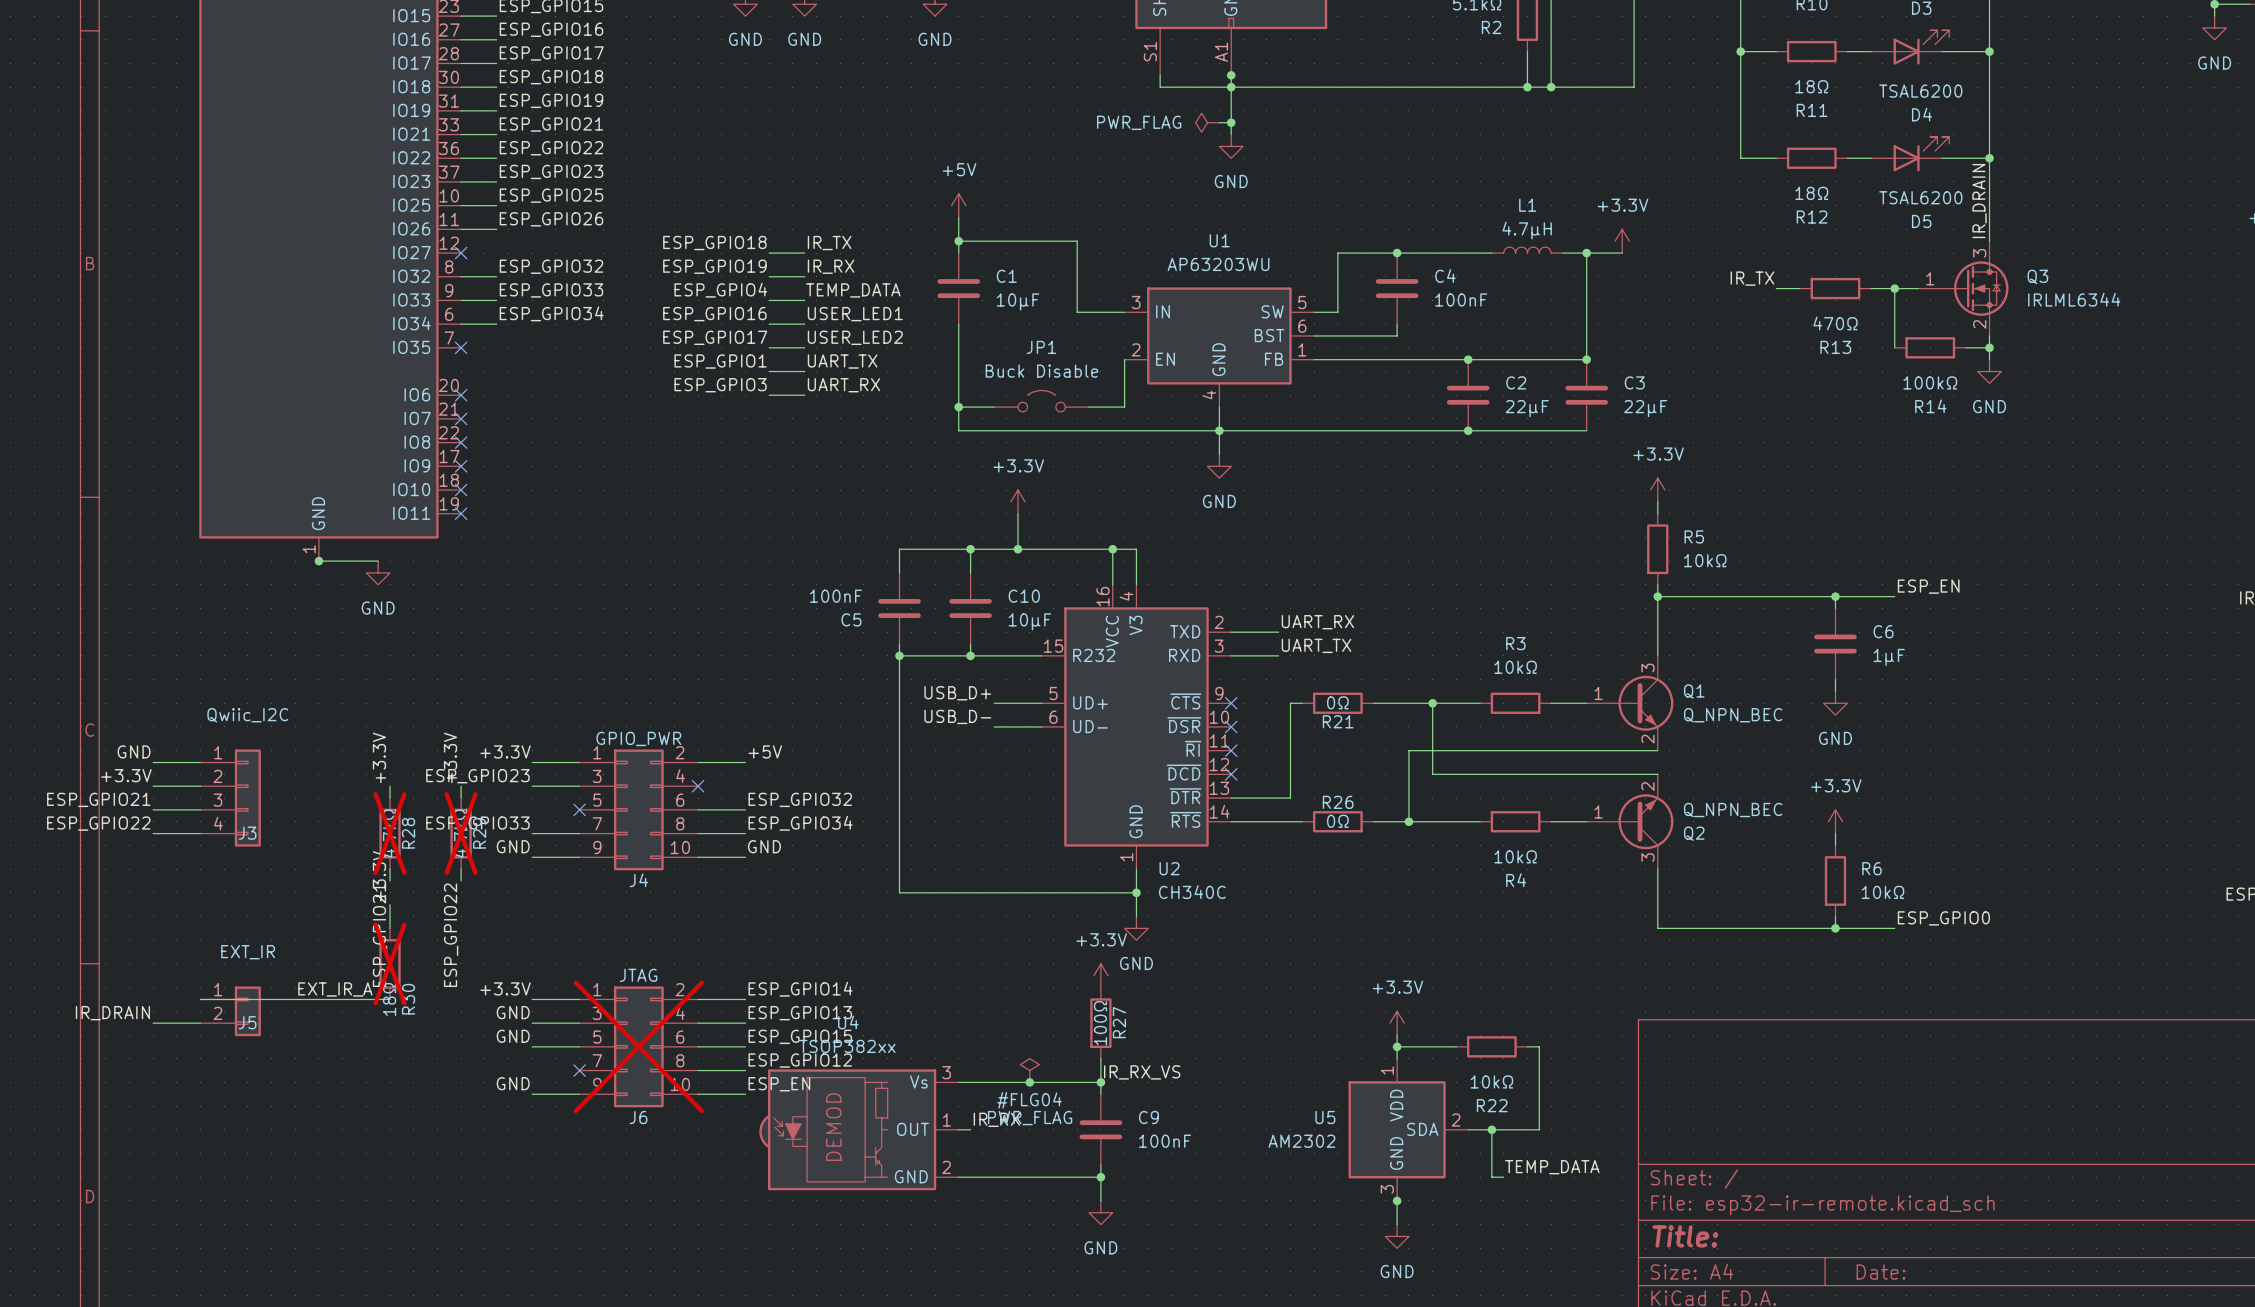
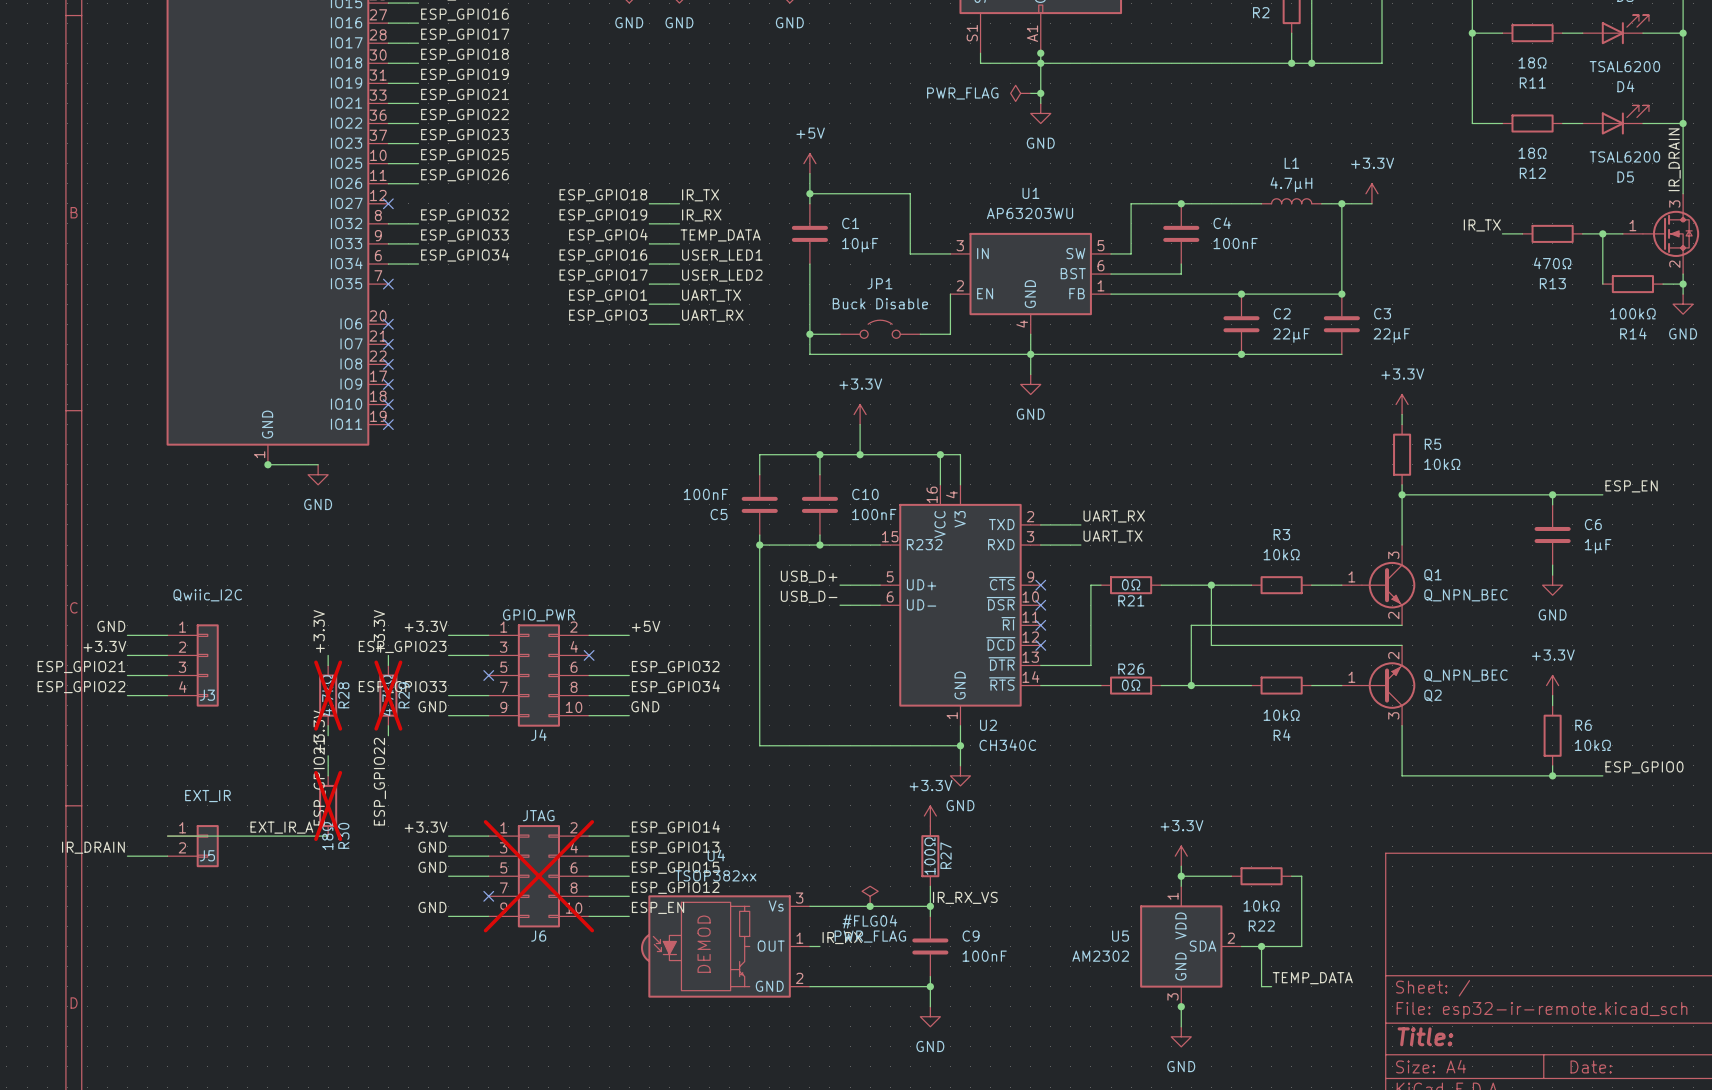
C10 value: 10µF (1029, 621) -> 100nF (874, 514)

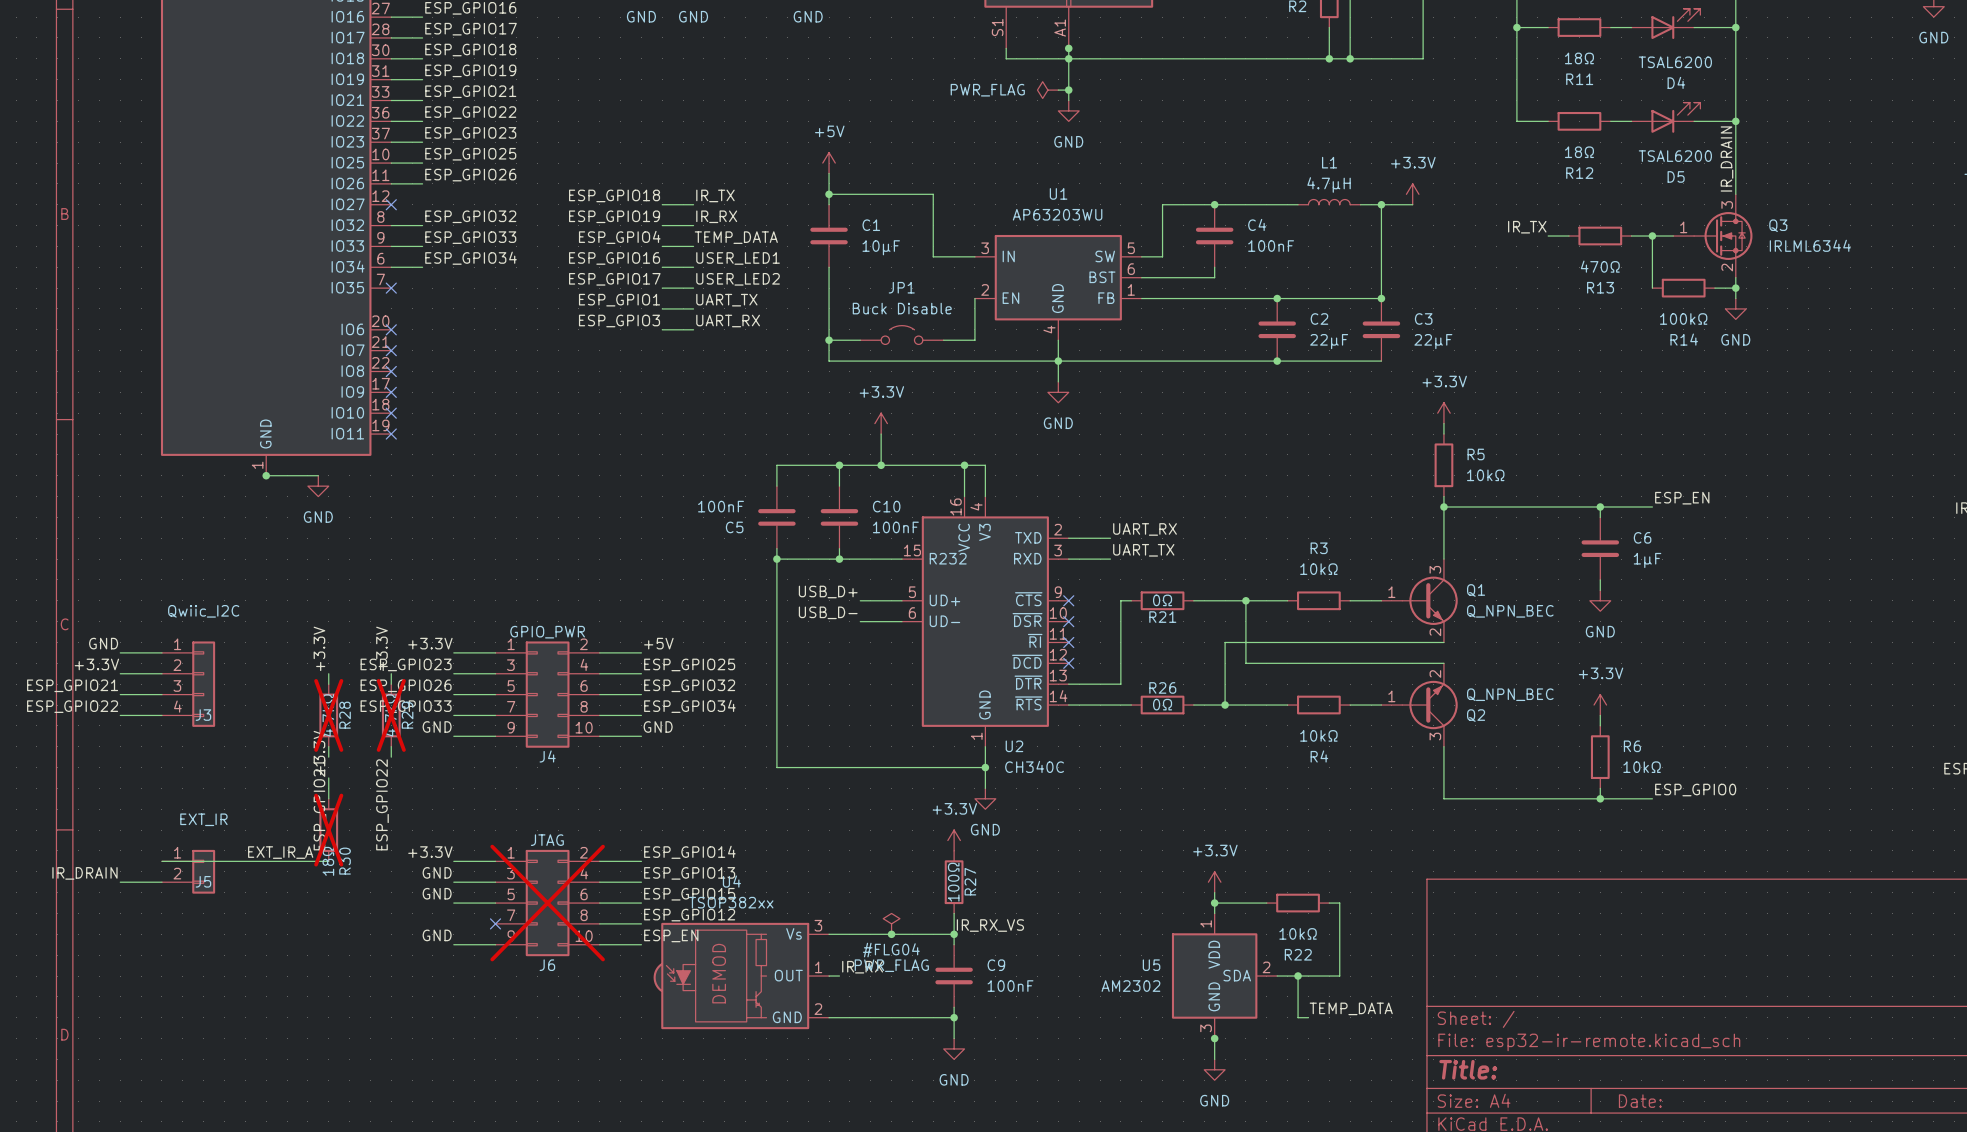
label: none -> ESP_GPIO25 (689, 664)
wire: none -> (599, 673) (641, 673)
no-connect mark: (589, 655) -> none
label: none -> ESP_GPIO26 (406, 685)
wire: none -> (453, 694) (495, 694)
no-connect mark: (488, 675) -> none

